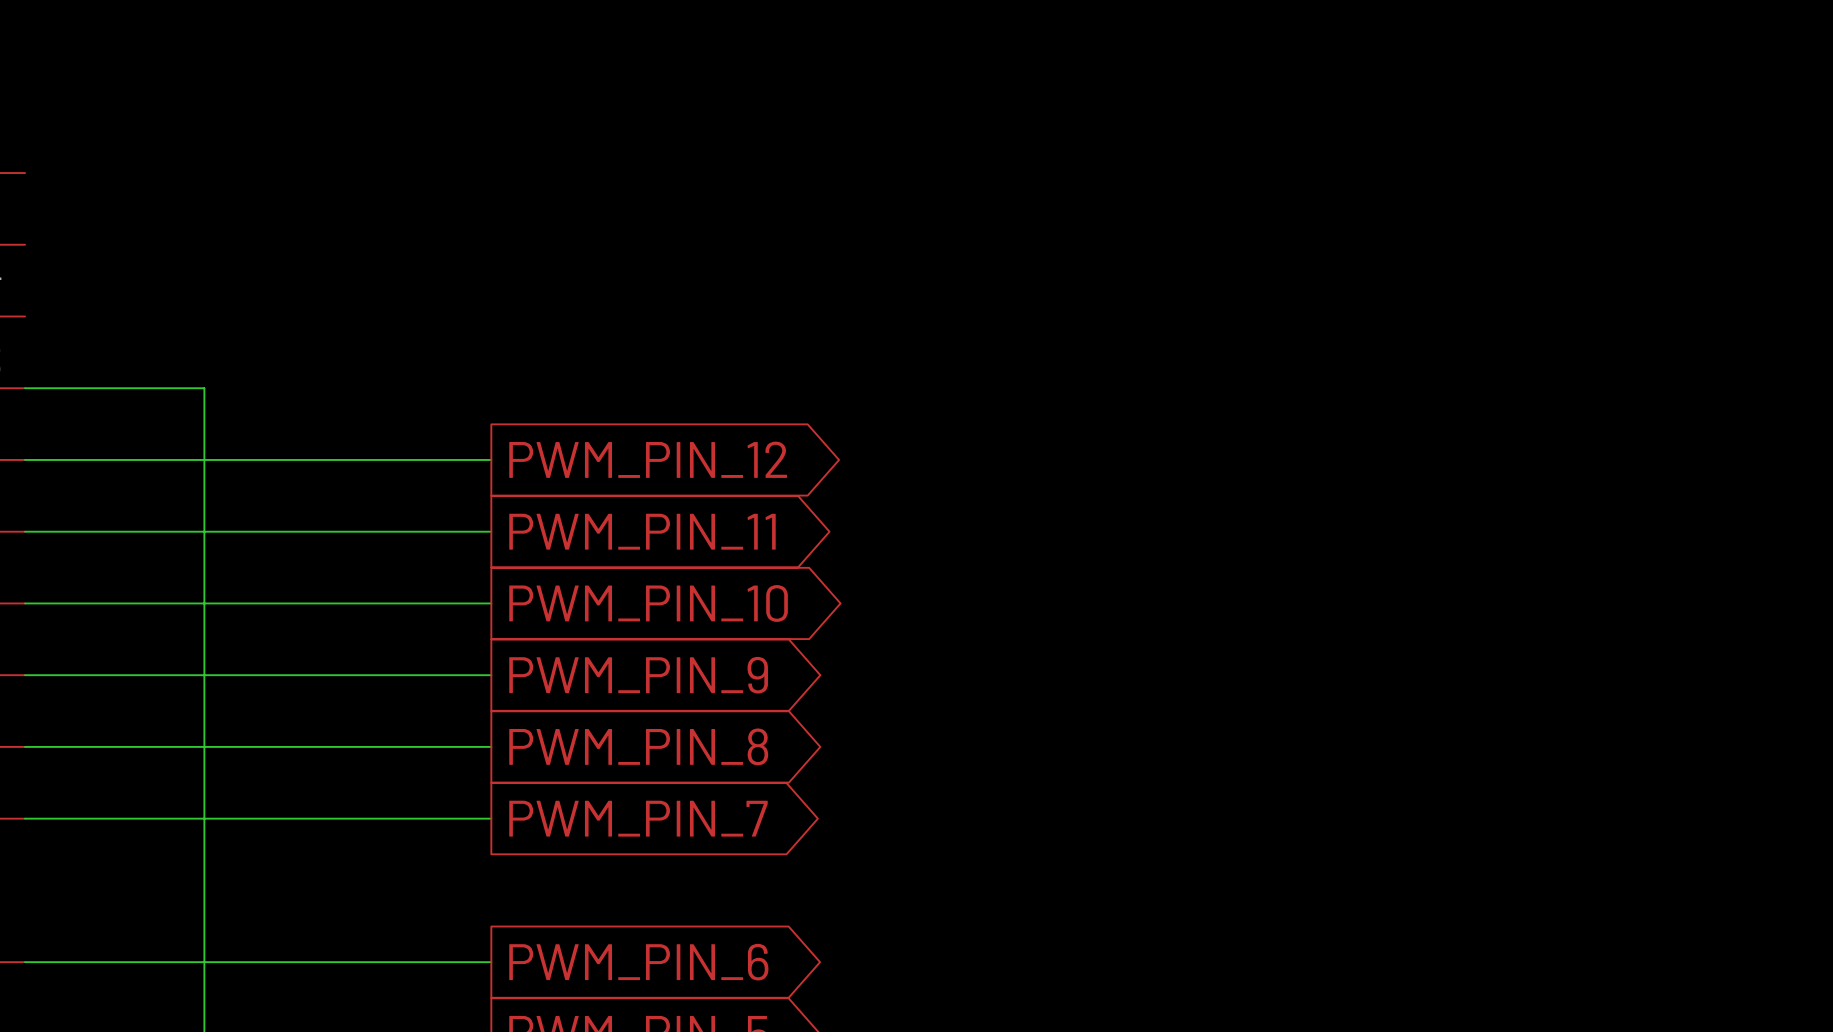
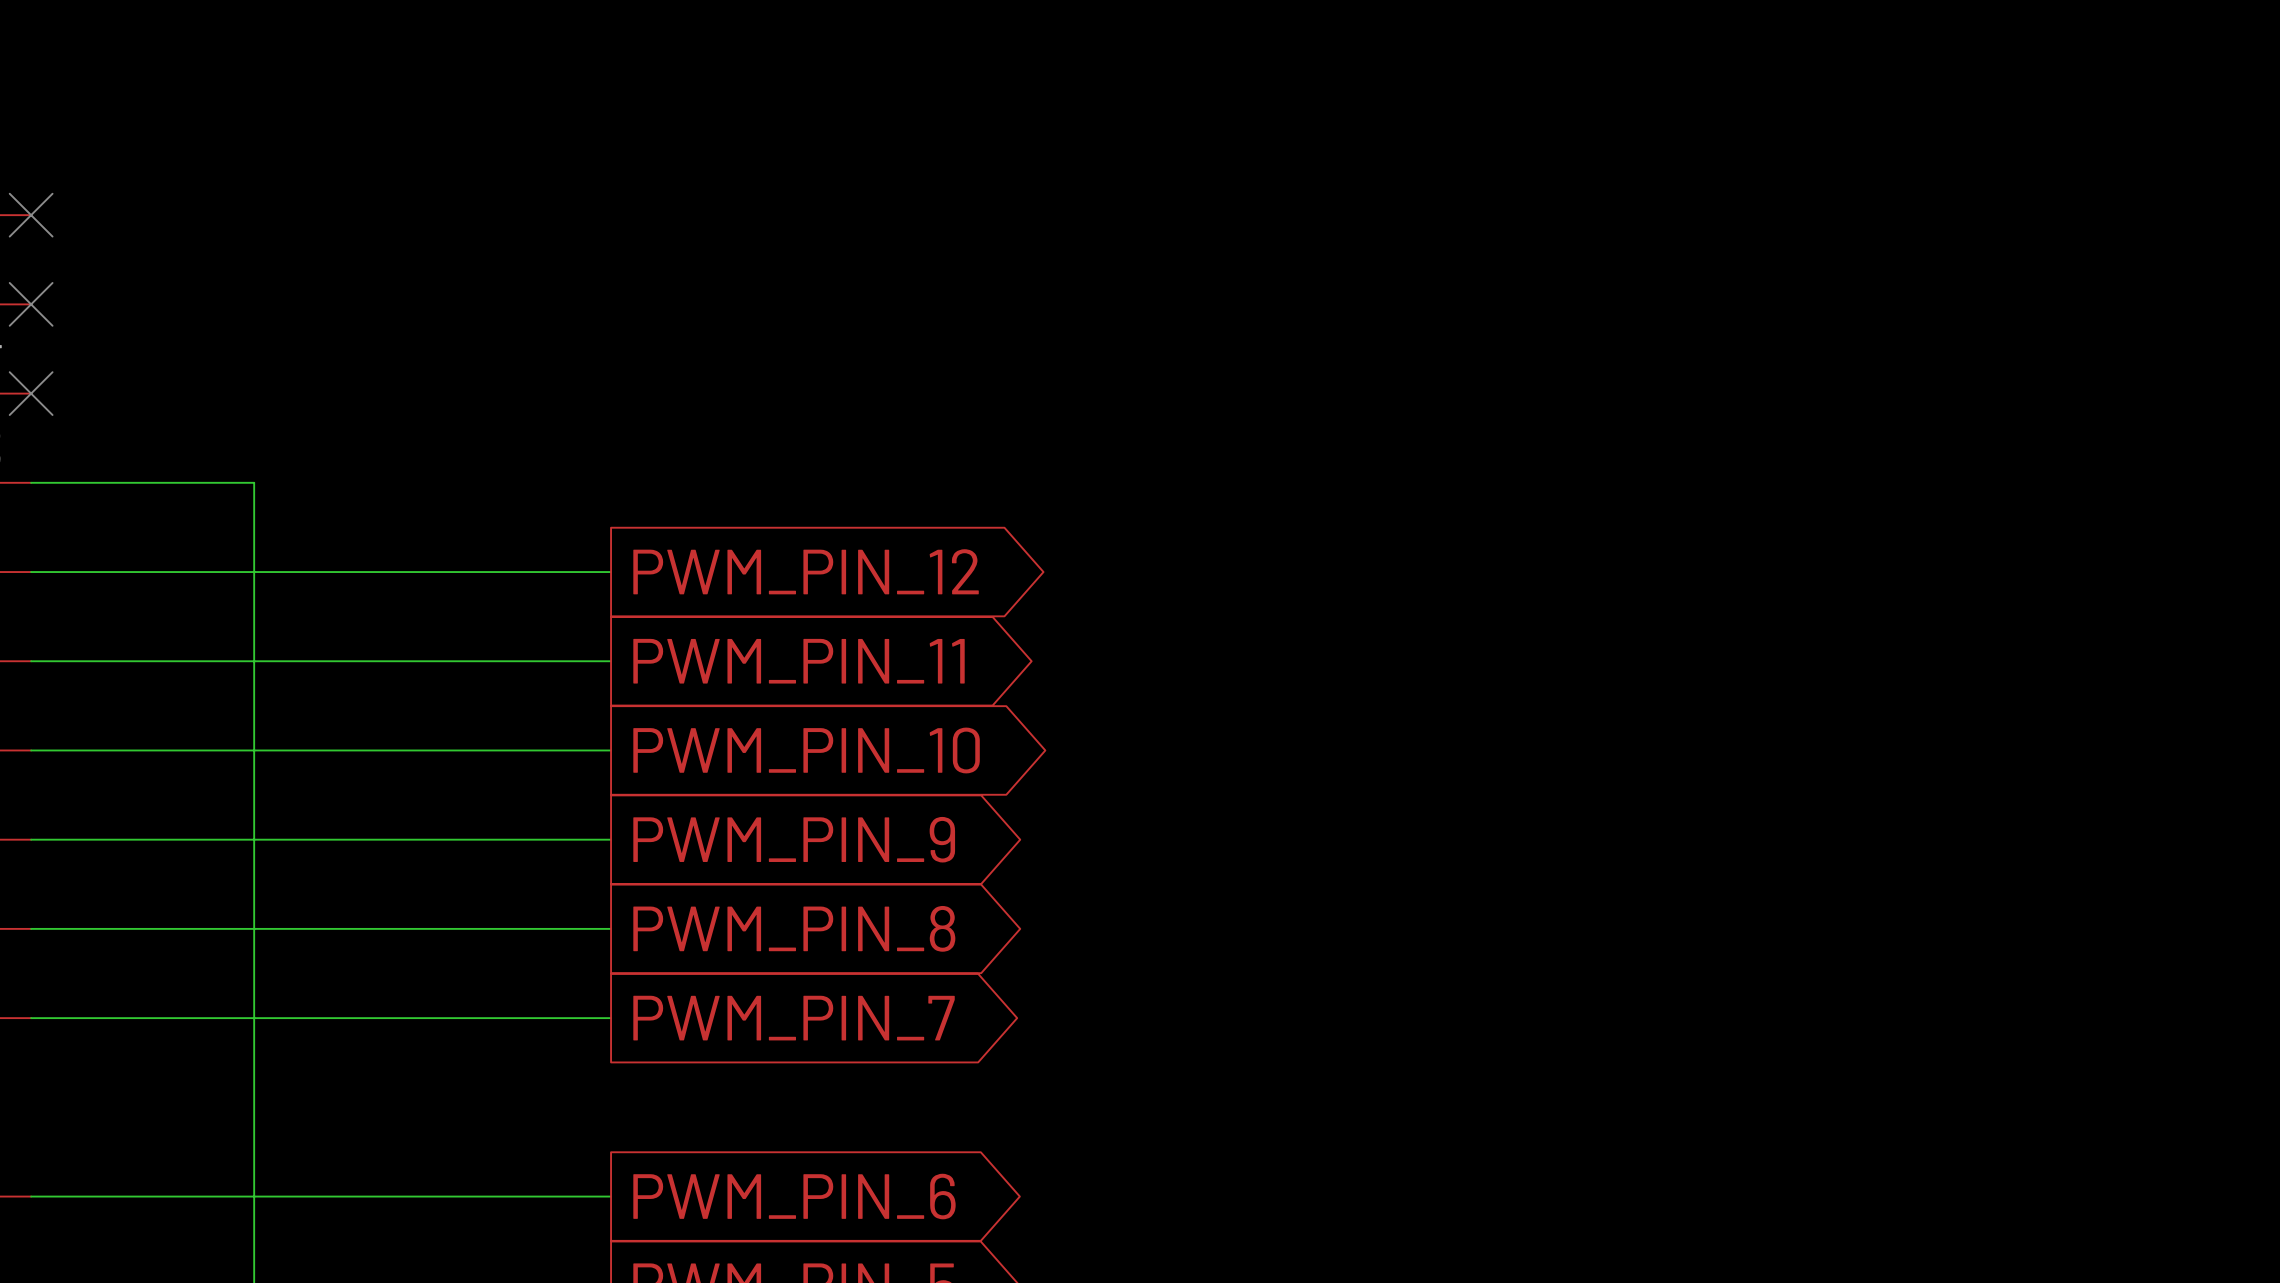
no-connect mark: none -> (31, 215)
no-connect mark: none -> (31, 304)
no-connect mark: none -> (31, 393)

